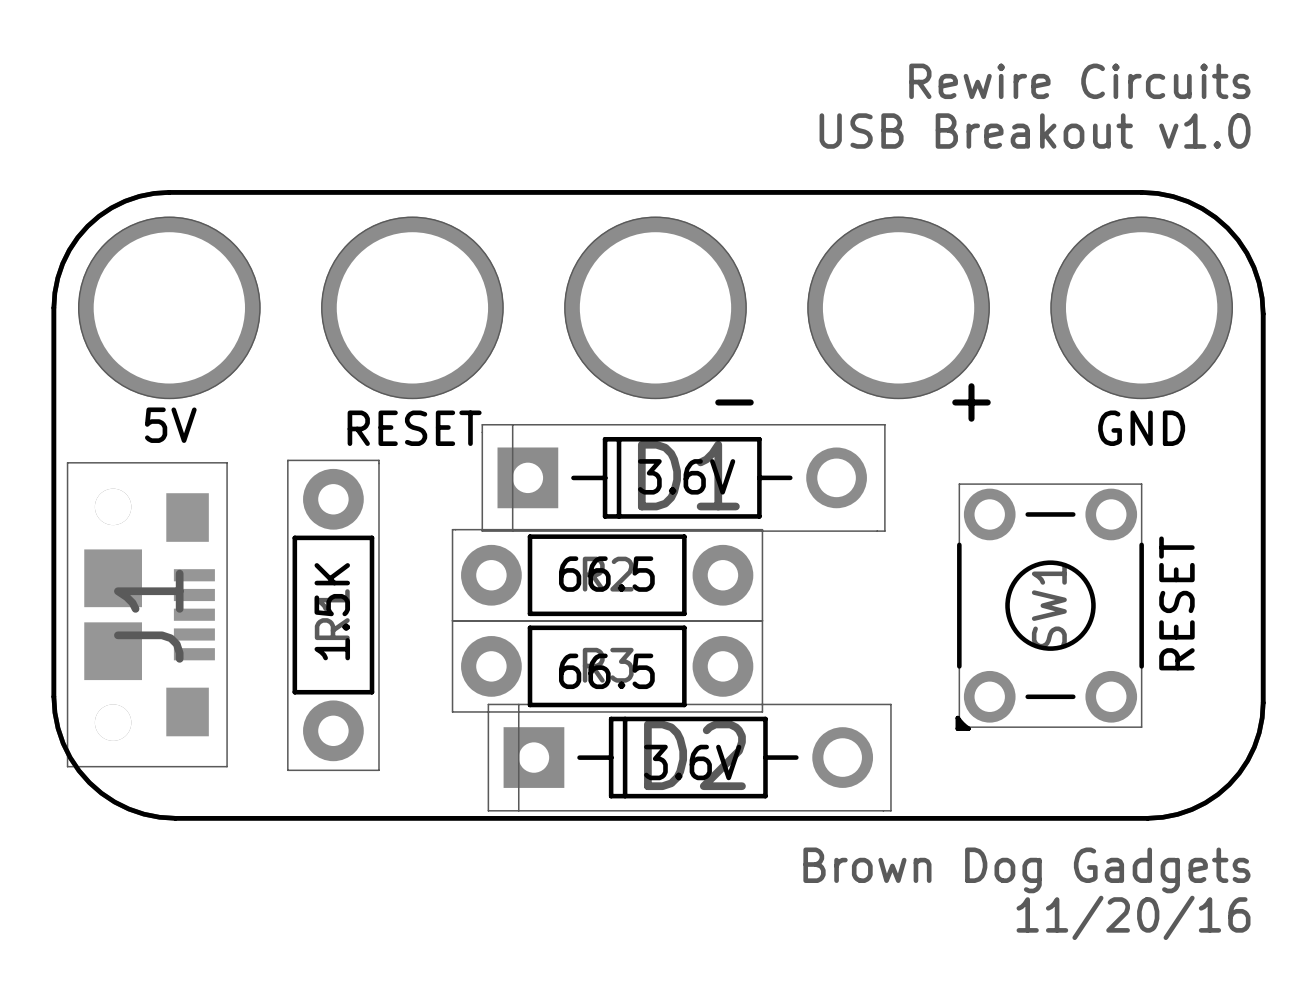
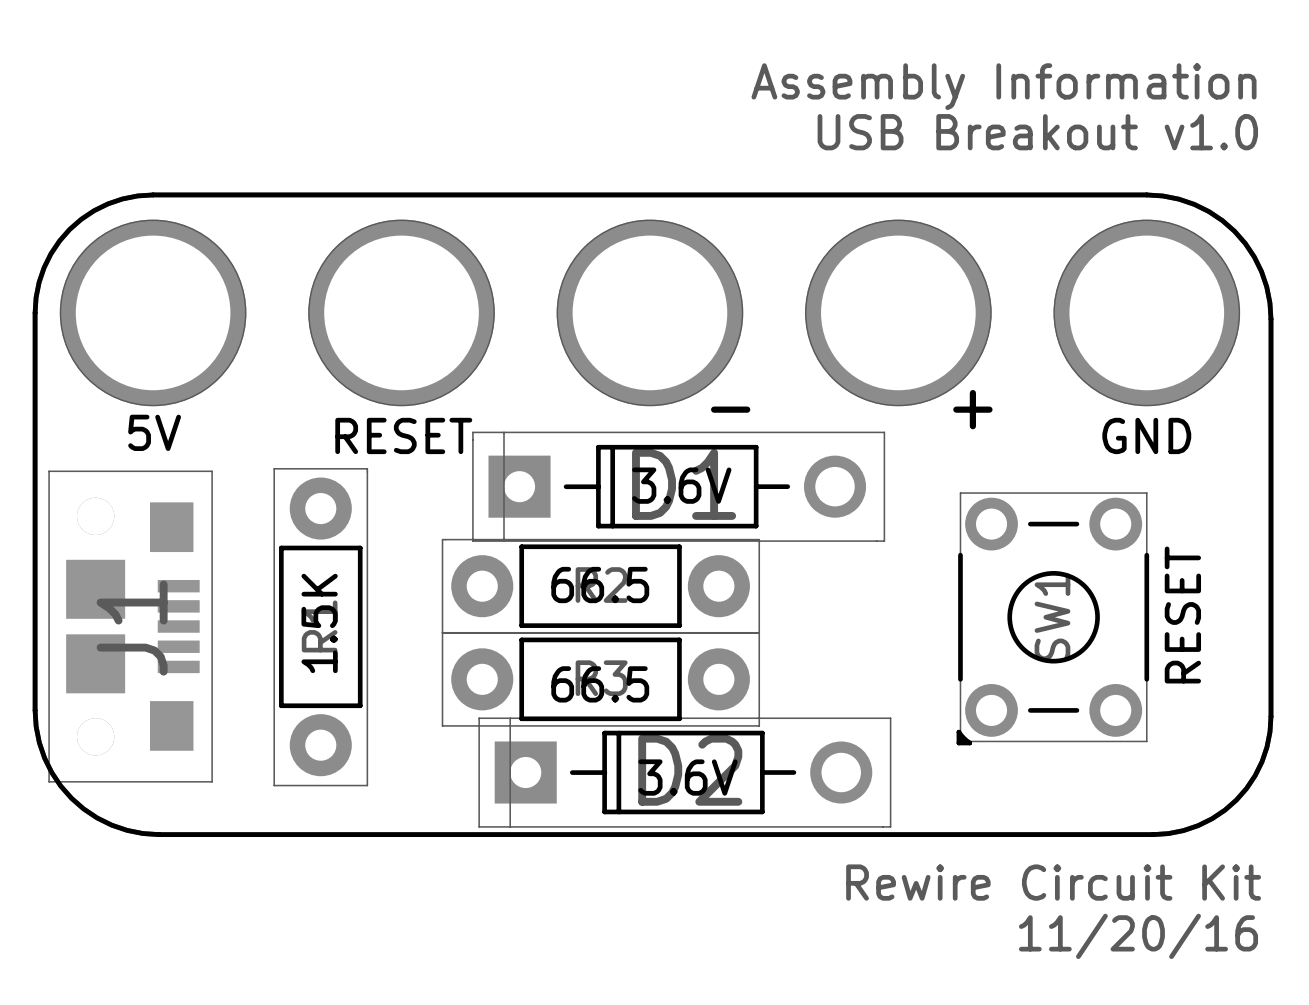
text: Rewire Circuits (1079, 81) -> Assembly Information (1004, 86)
text: Brown Dog Gadgets (1026, 870) -> Rewire Circuit Kit (1053, 882)

